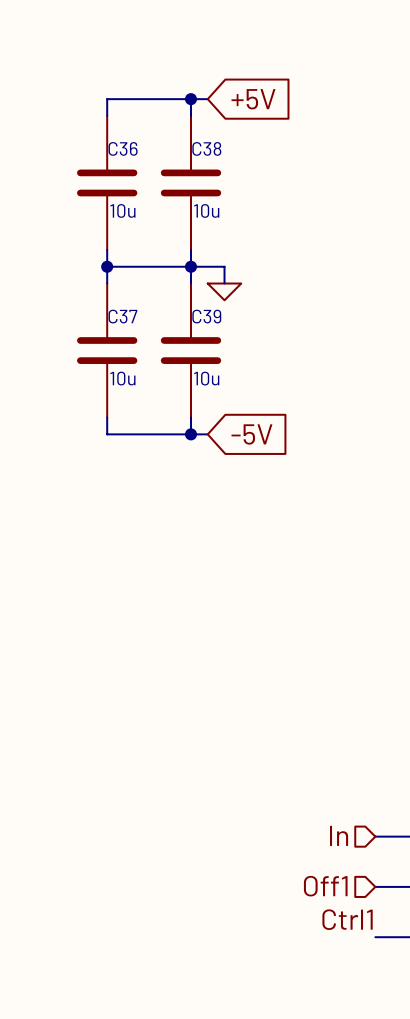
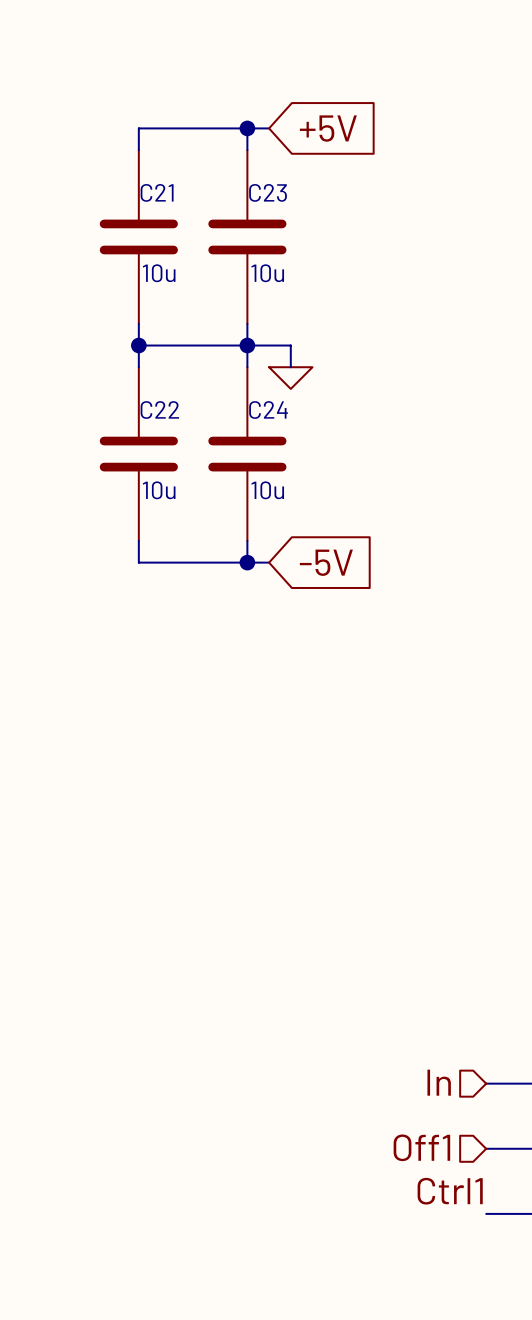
C36 name: C36 (123, 148) -> C21 (157, 192)
C38 name: C38 (206, 148) -> C23 (268, 192)
C37 name: C37 (122, 316) -> C22 (159, 410)
C39 name: C39 (206, 316) -> C24 (268, 410)

